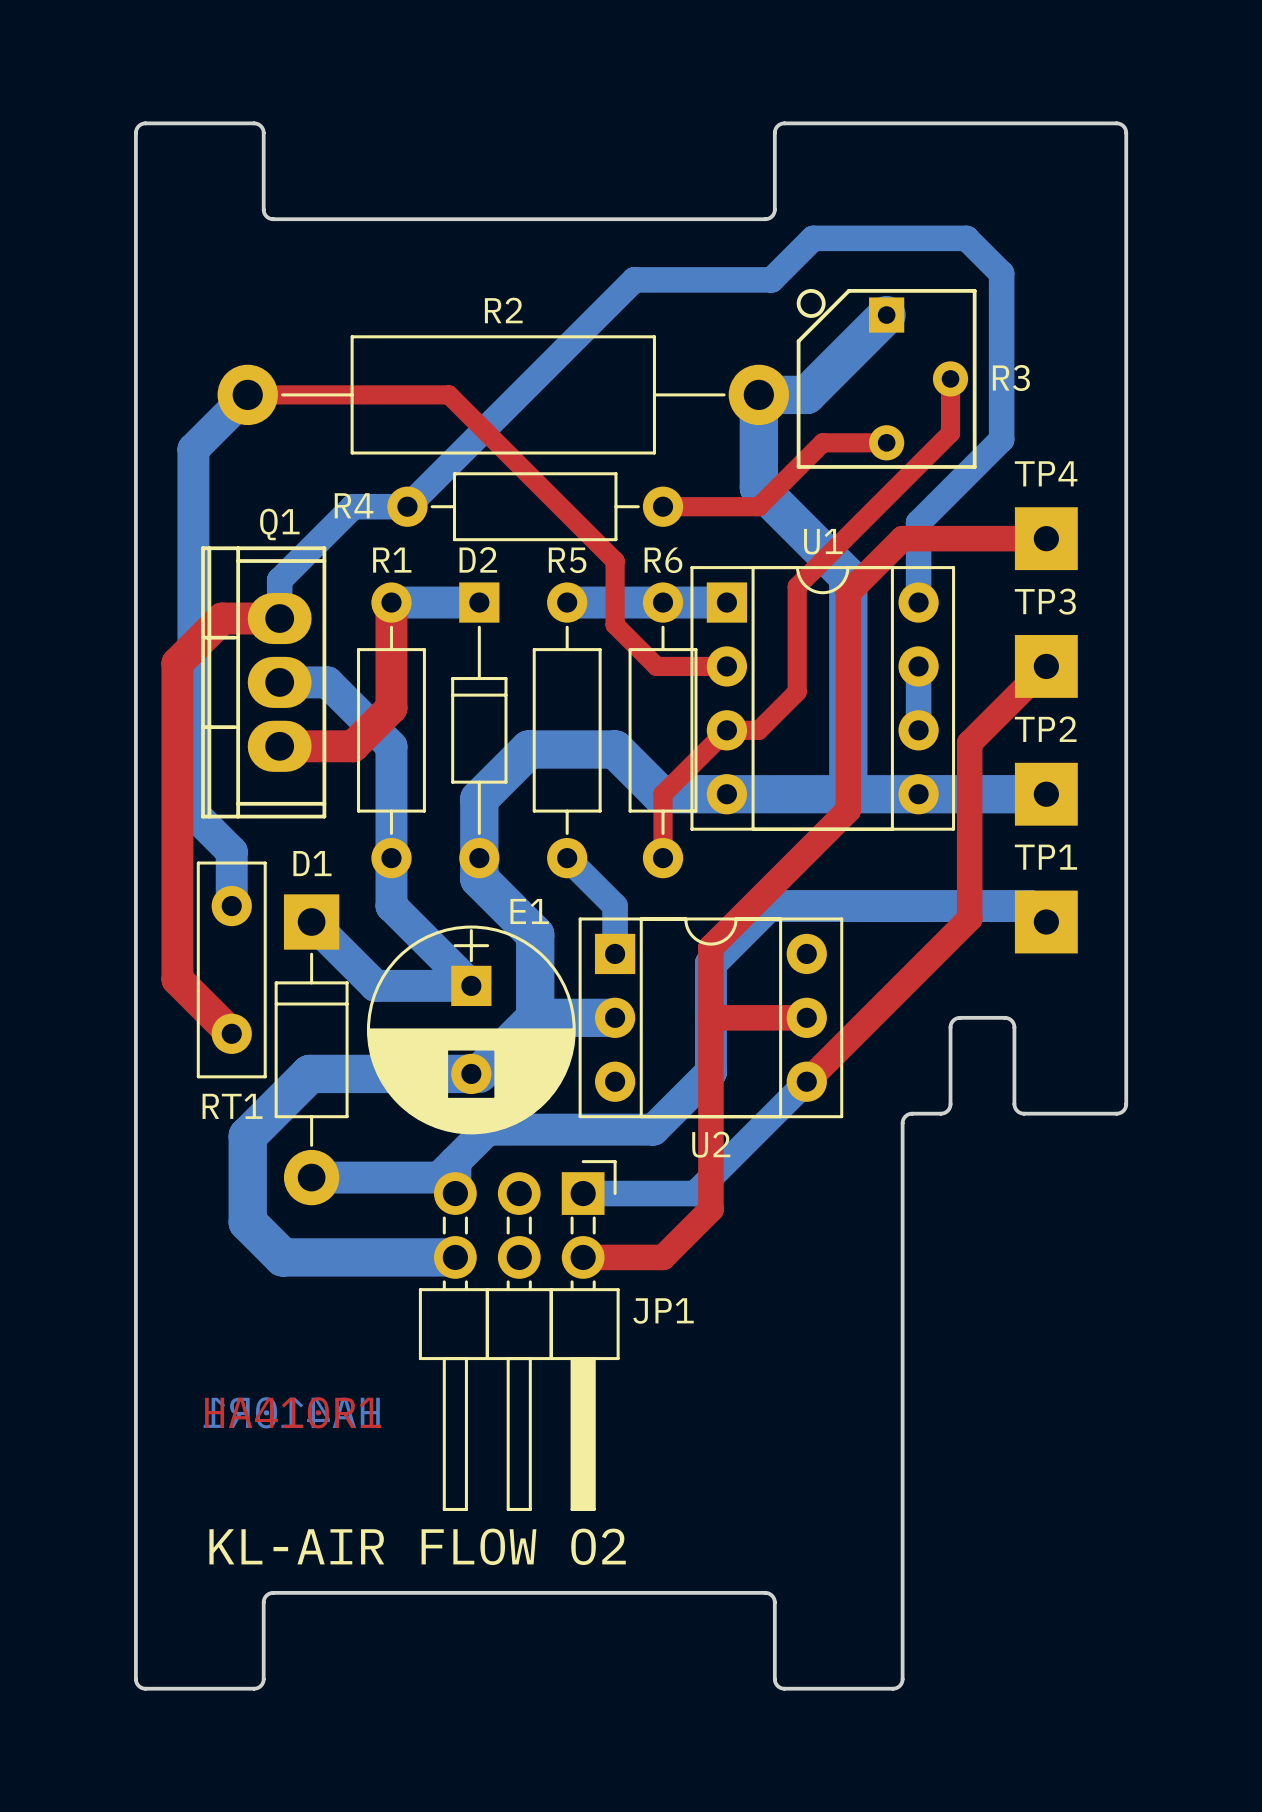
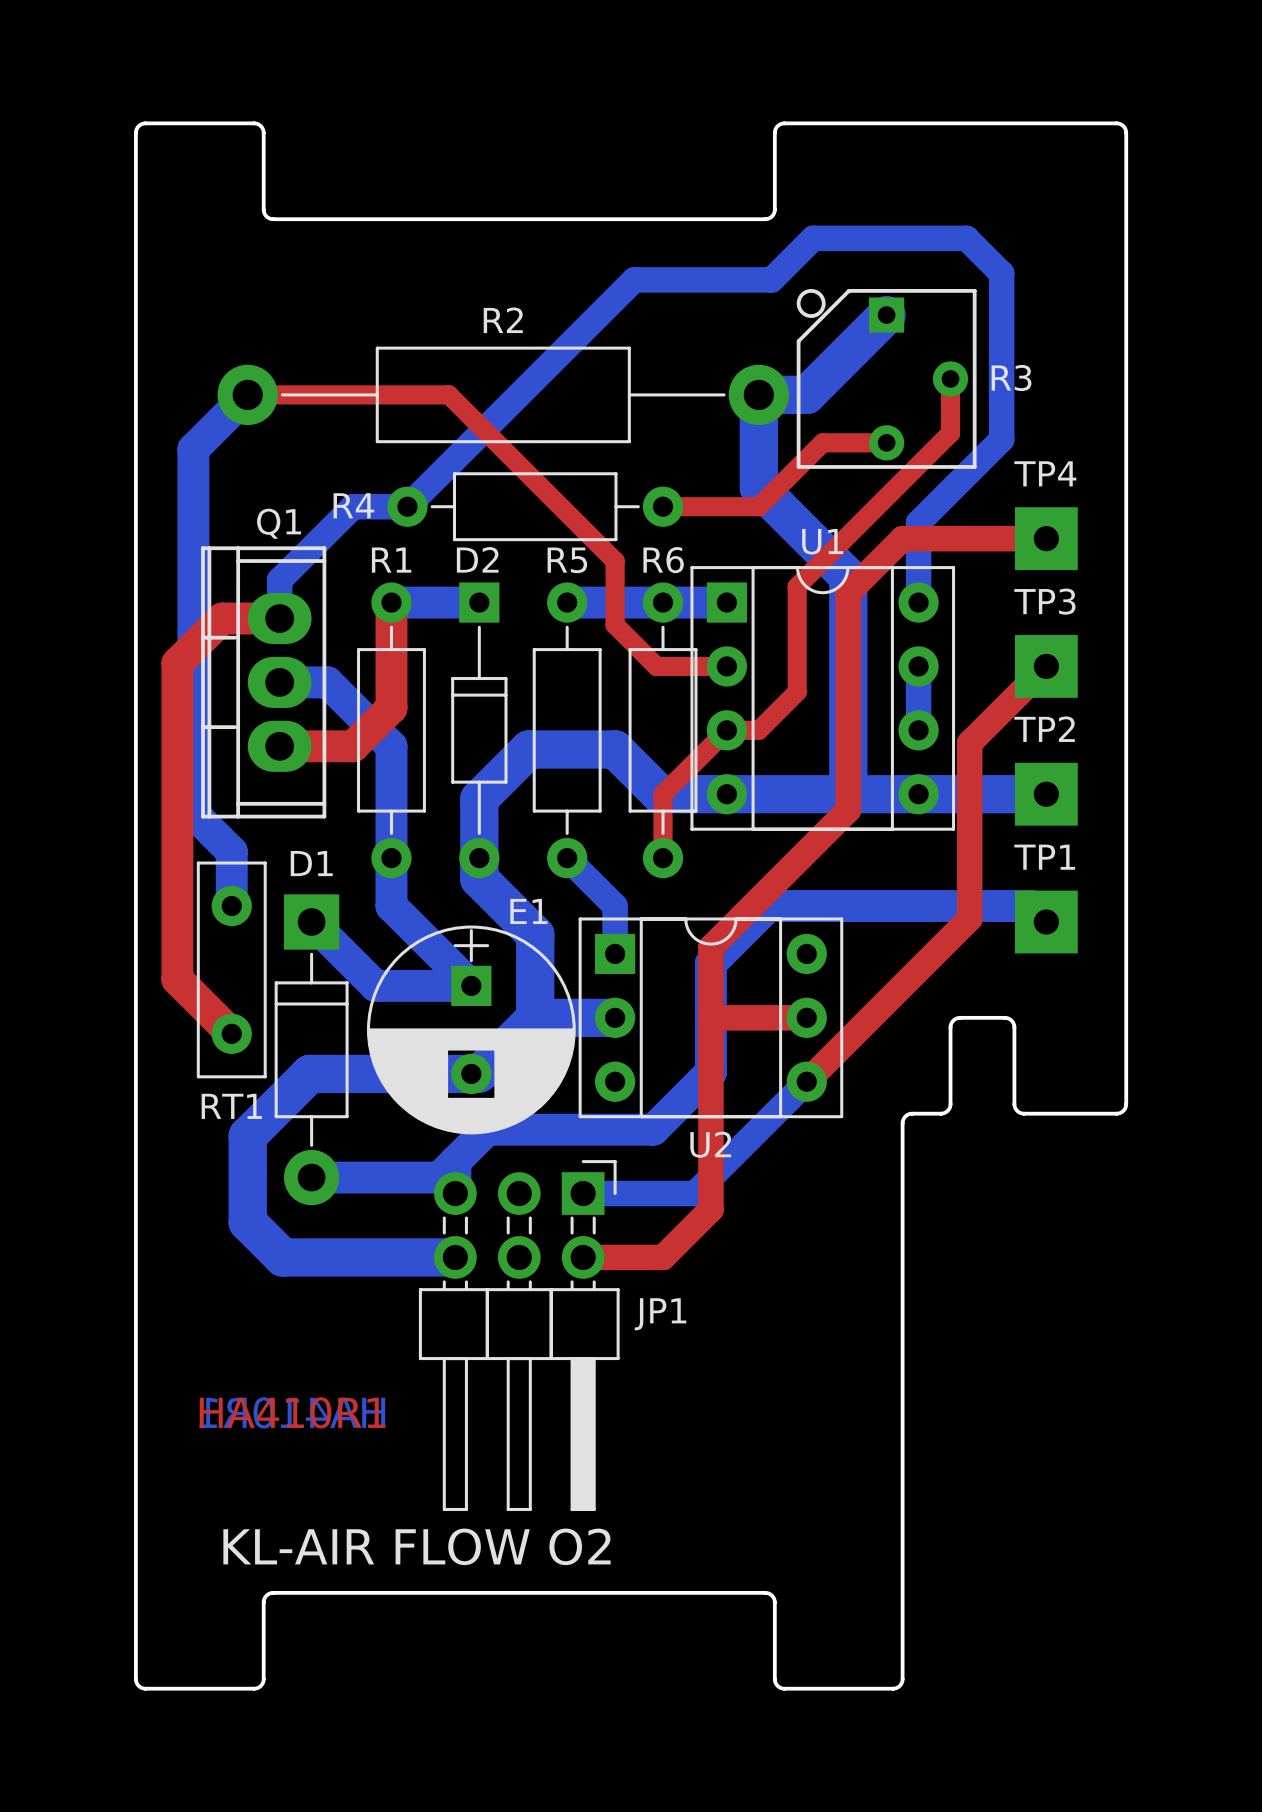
R2 footprint: [217, 335, 790, 455] -> [217, 346, 790, 444]

